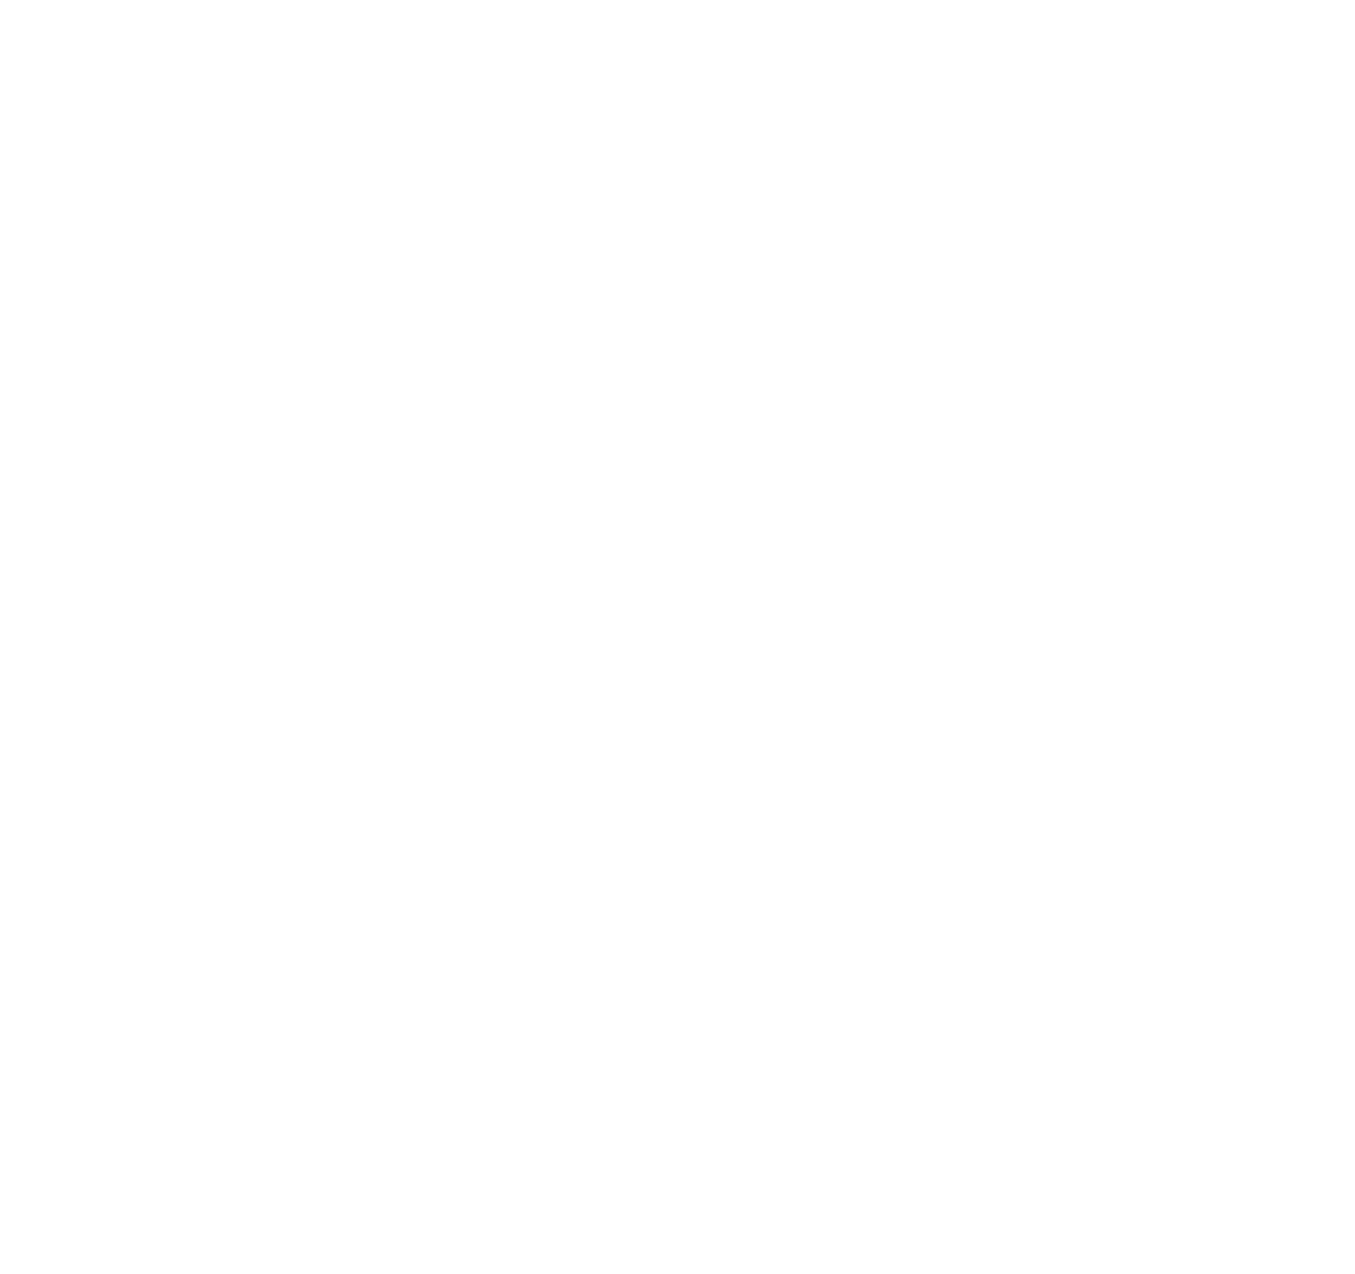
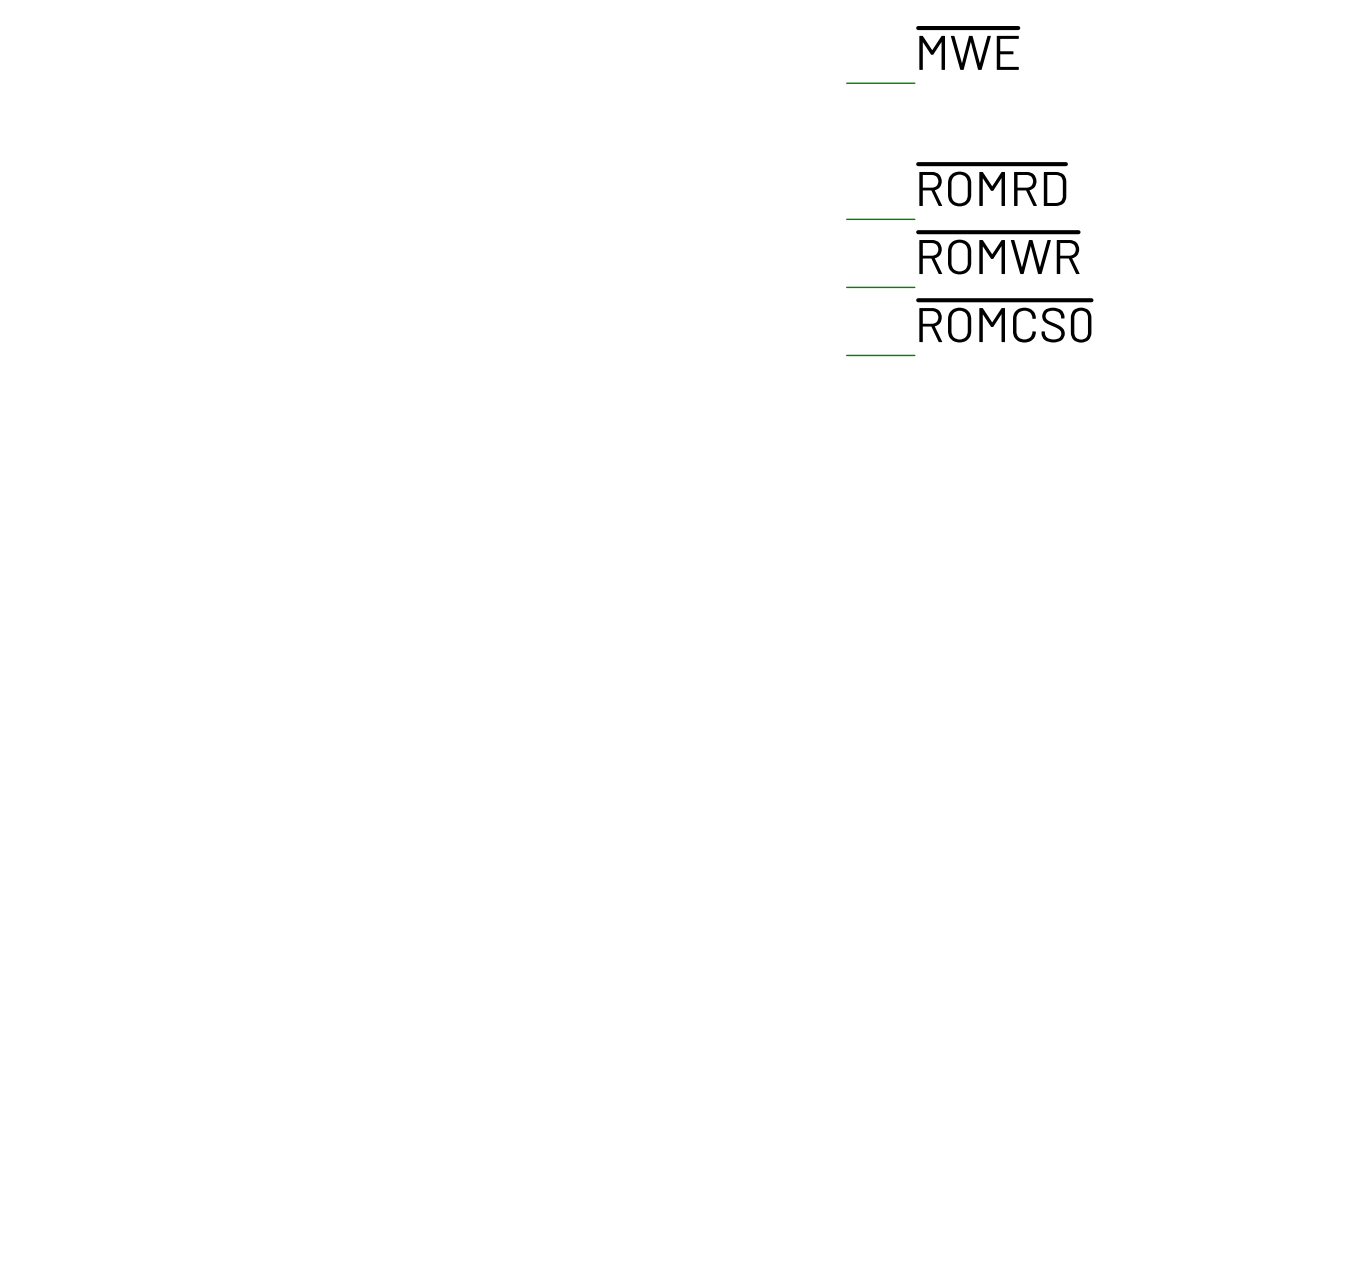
label: none -> ~{MWE} (968, 48)
wire: none -> (846, 83) (914, 83)
label: none -> ~{ROMRD} (992, 185)
wire: none -> (846, 219) (914, 219)
label: none -> ~{ROMWR} (998, 253)
wire: none -> (846, 287) (914, 287)
label: none -> ~{ROMCS0} (1004, 321)
wire: none -> (846, 355) (914, 355)

